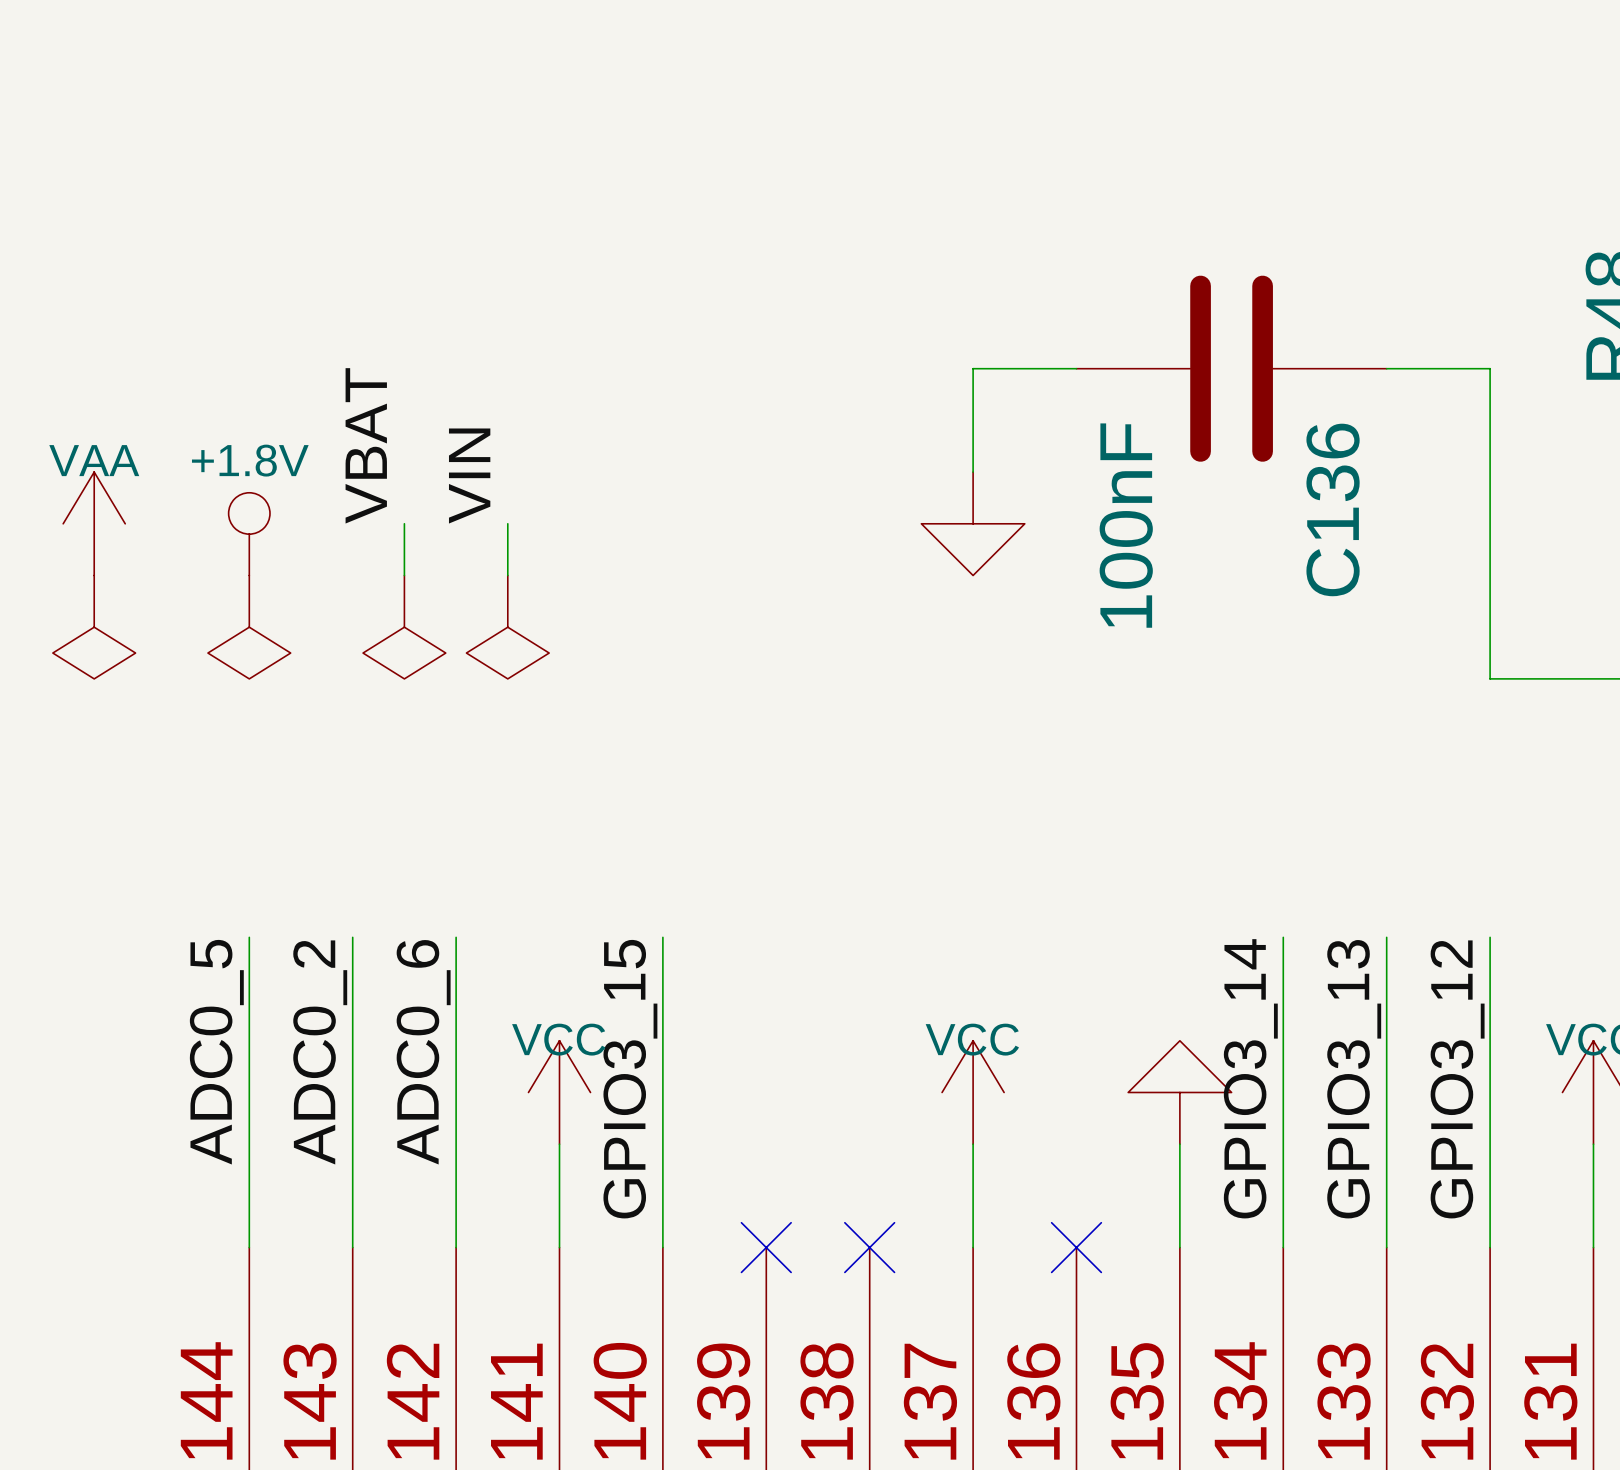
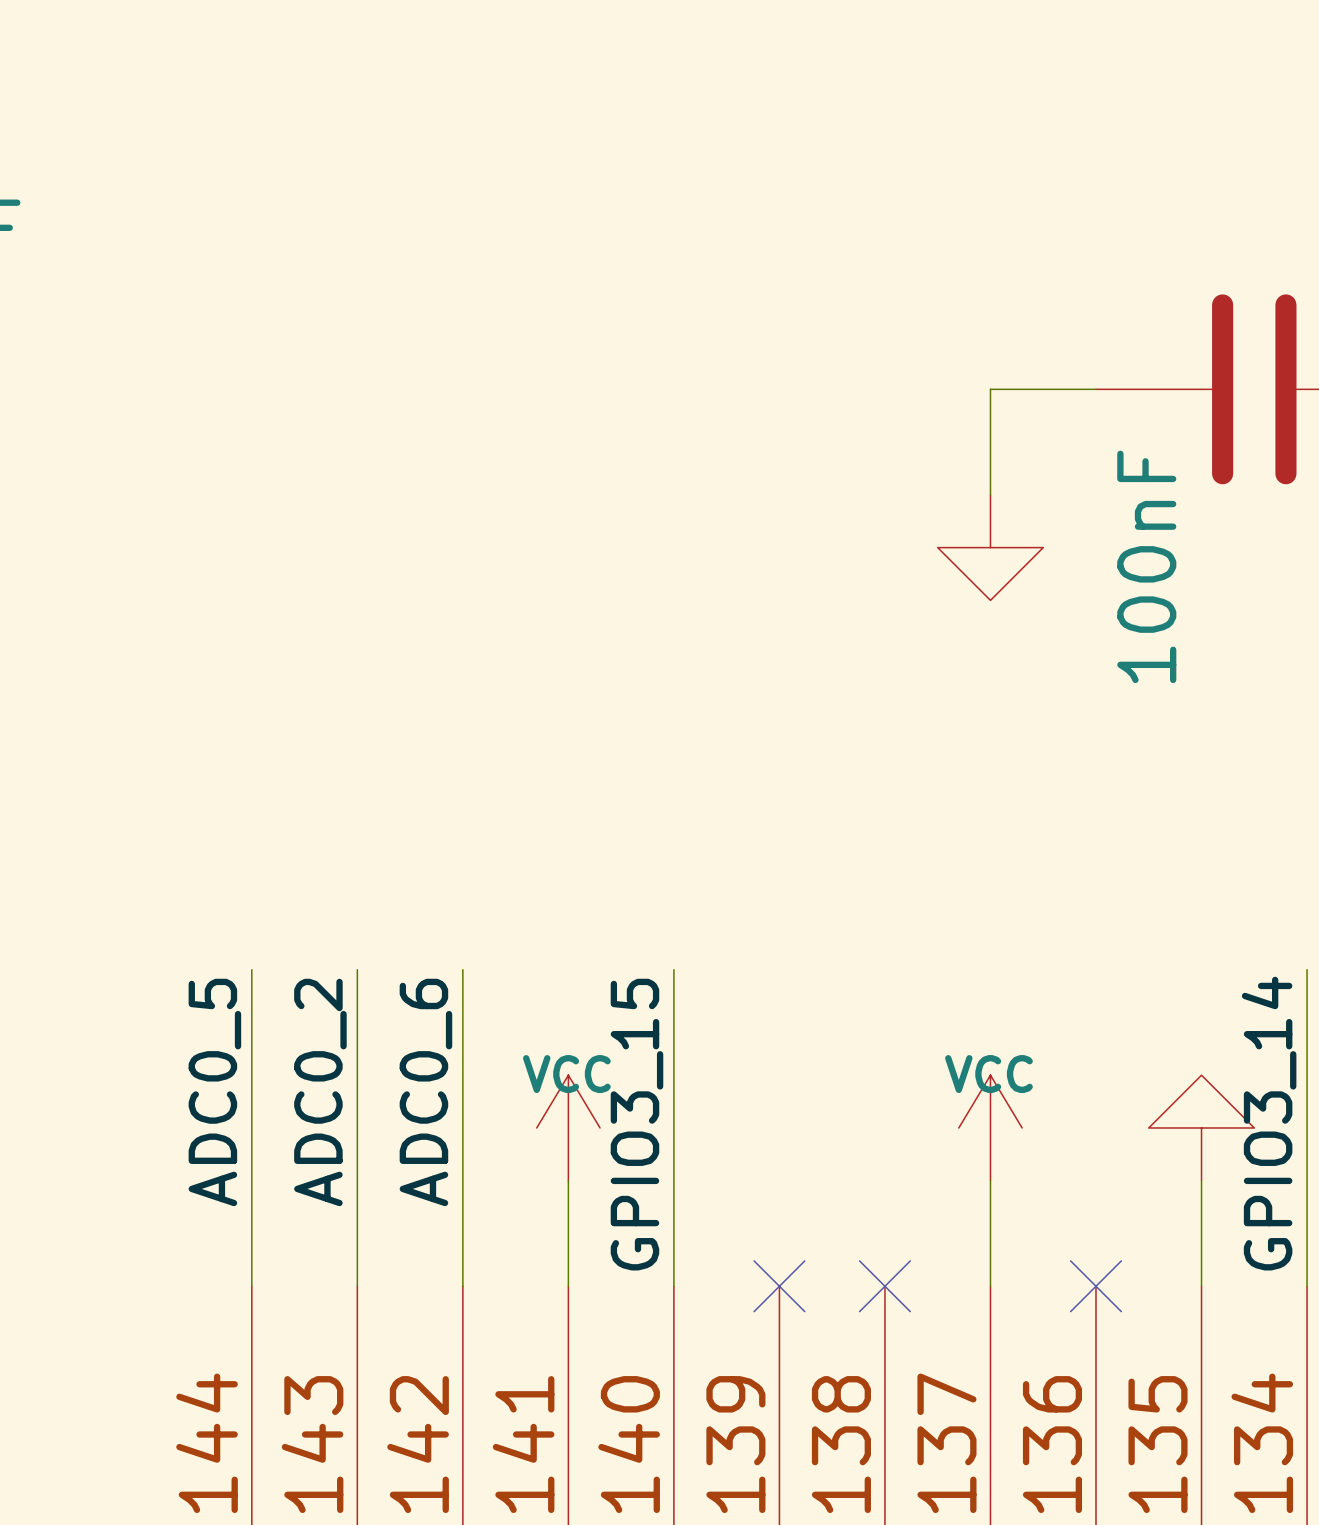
label: VBAT (366, 445) -> none
label: VIN (469, 476) -> none
power symbol: VAA (94, 523) -> none
wire: (404, 523) (404, 575) -> none
wire: (507, 523) (507, 575) -> none
power symbol: +1.8V (249, 534) -> none
power symbol: (94, 627) -> none
power symbol: (249, 627) -> none
power symbol: (404, 627) -> none
power symbol: (507, 627) -> none

